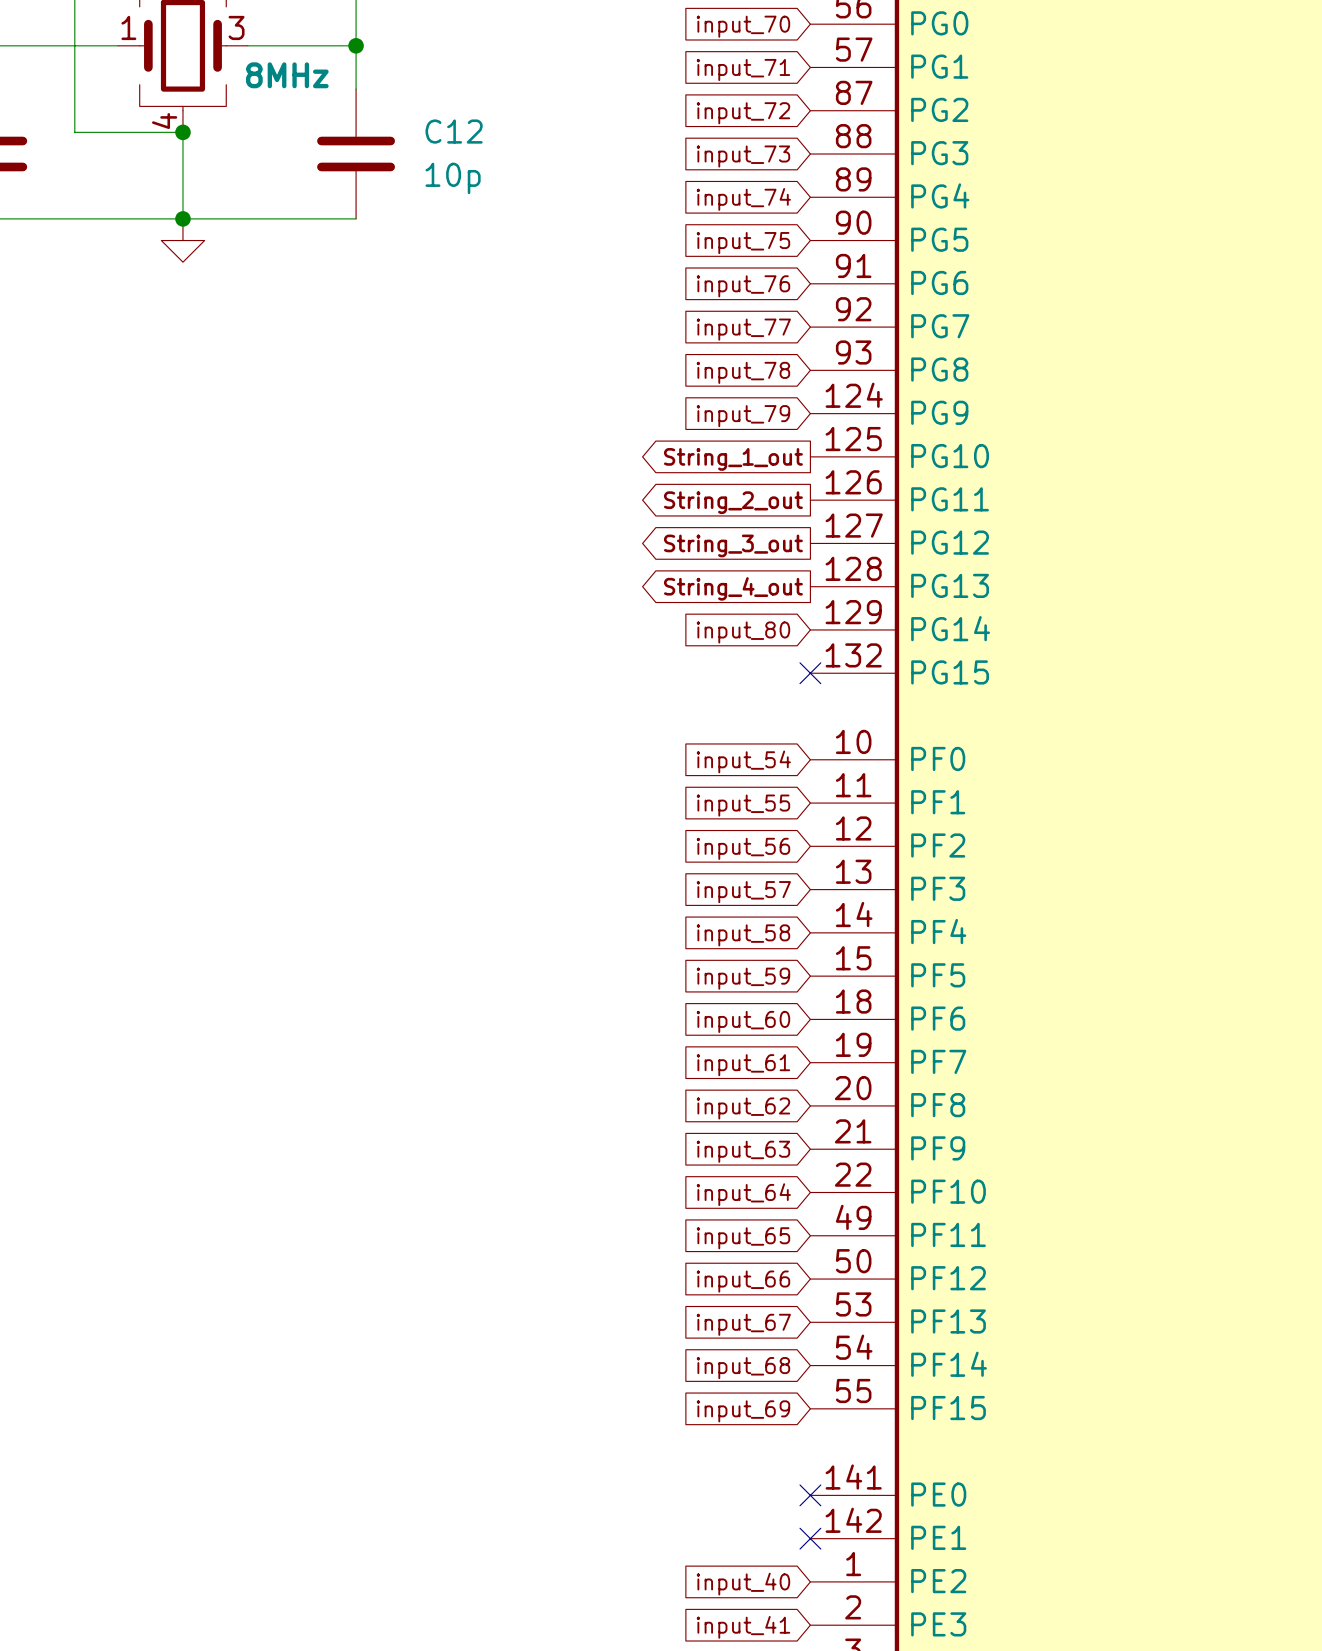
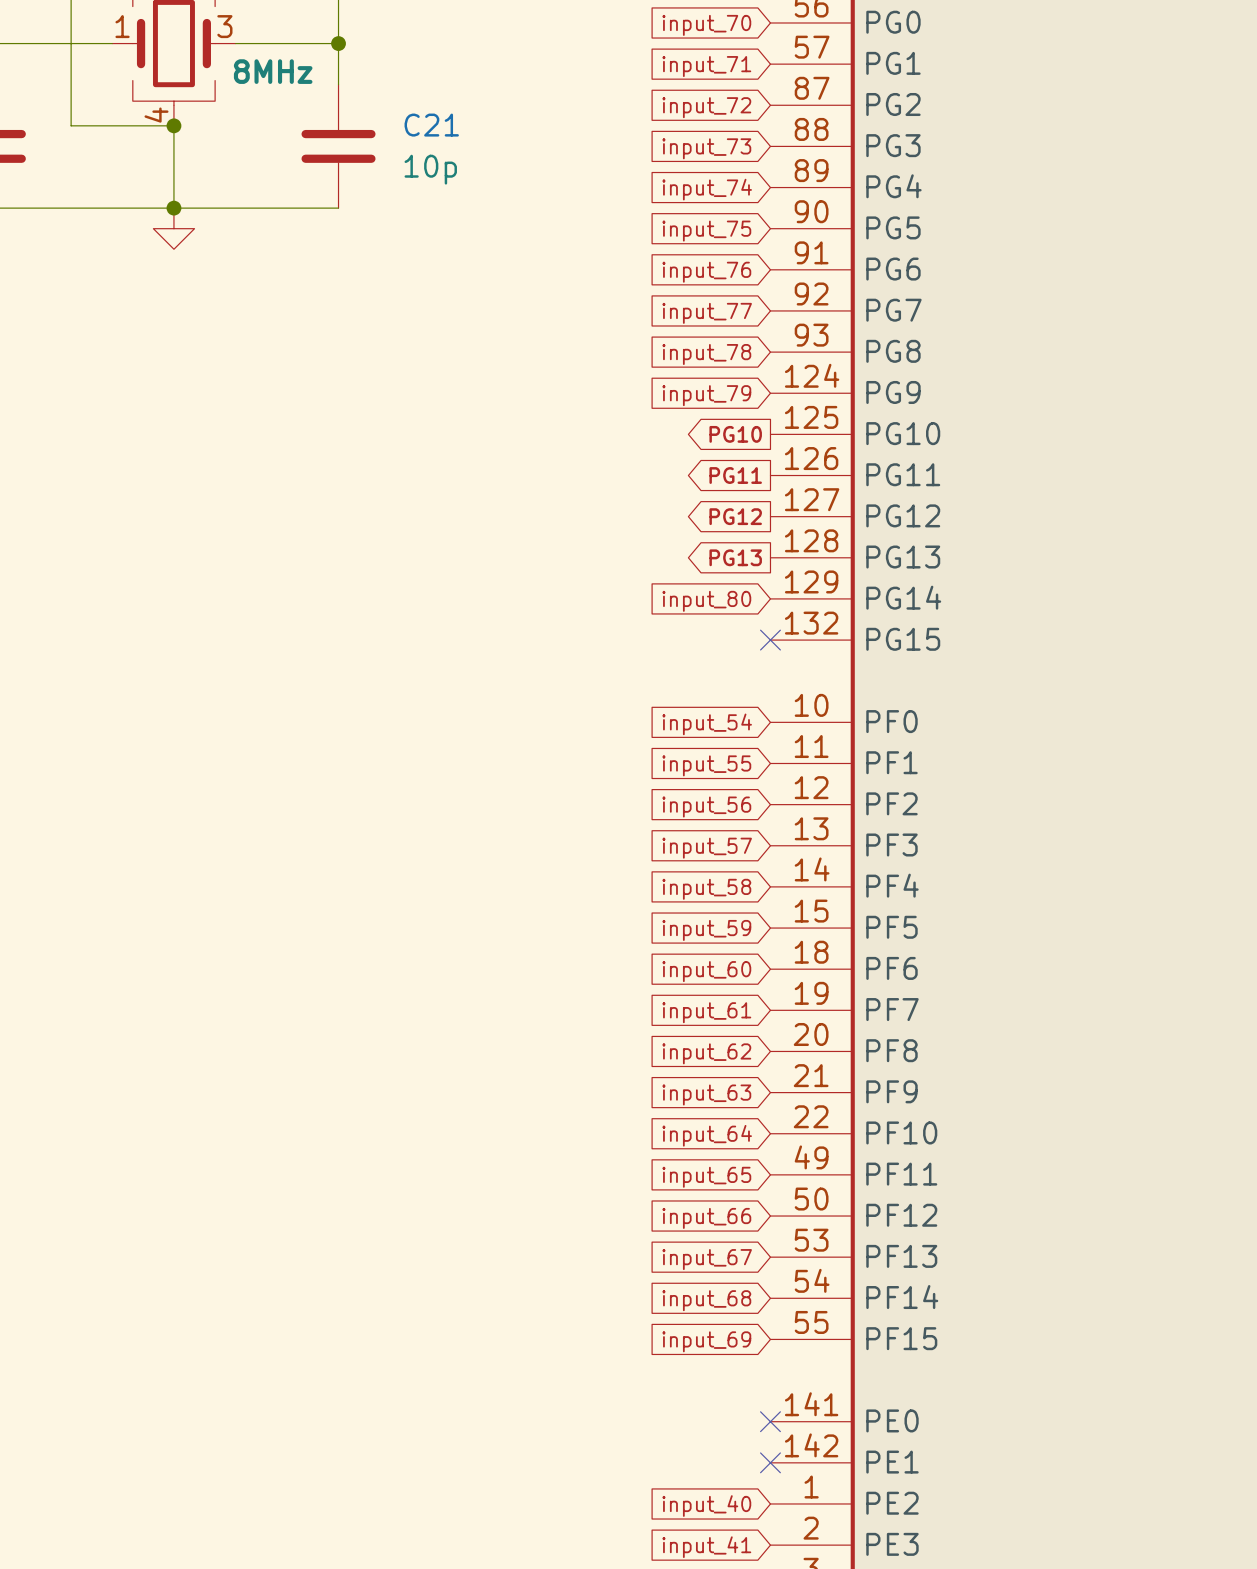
C12 name: C12 (454, 131) -> C21 (431, 125)
global label: String_1_out (733, 459) -> PG10 (735, 434)
global label: String_2_out (733, 502) -> PG11 (735, 475)
global label: String_3_out (733, 545) -> PG12 (735, 516)
global label: String_4_out (733, 588) -> PG13 (735, 557)

